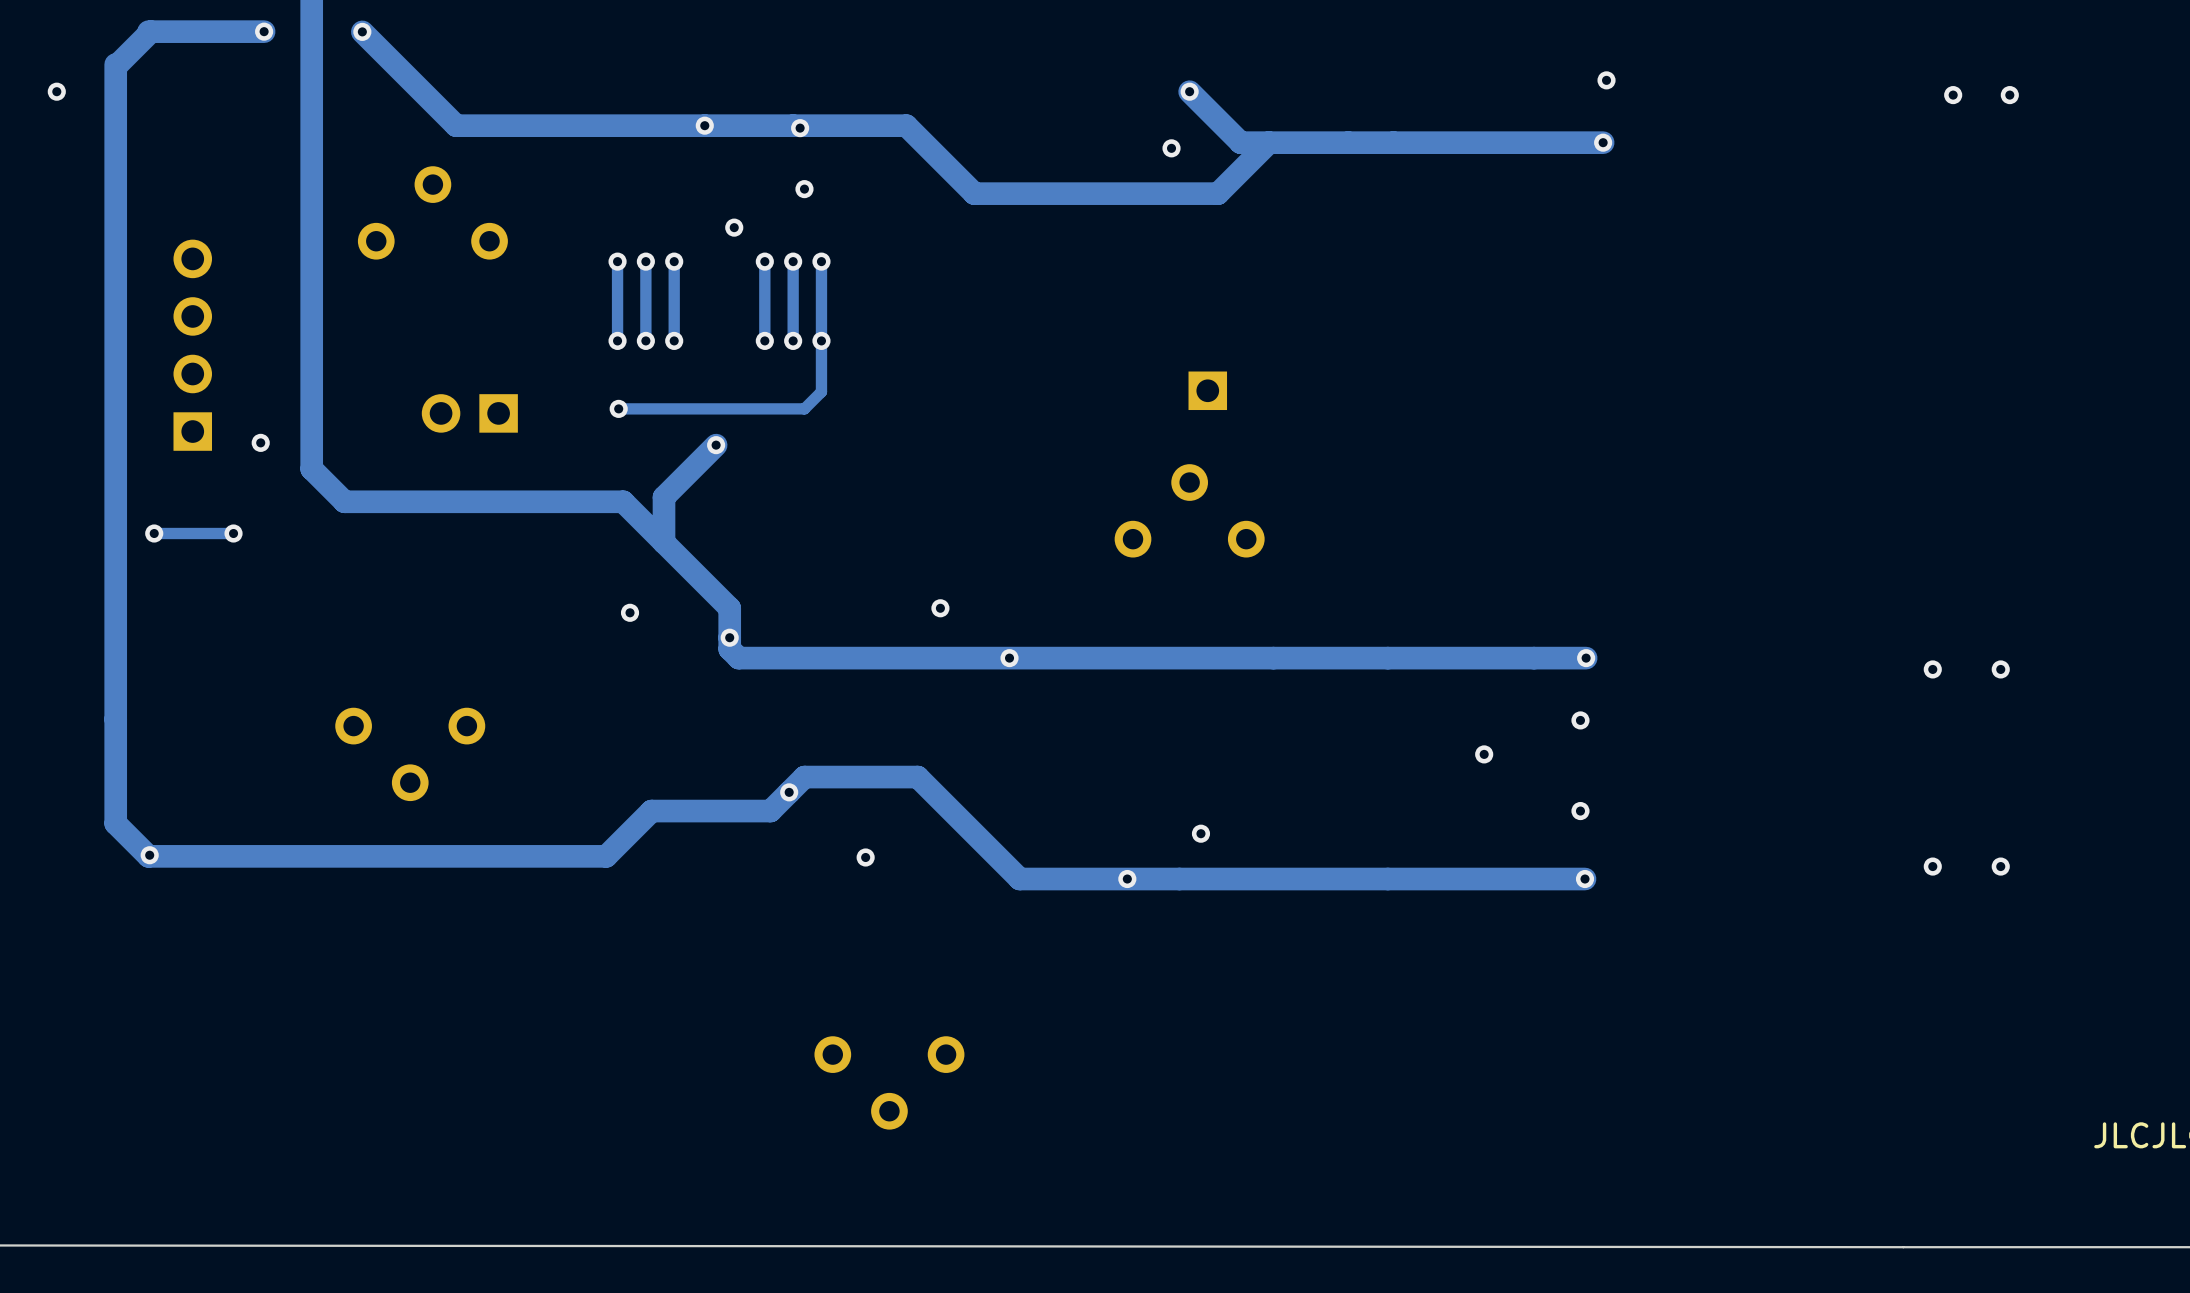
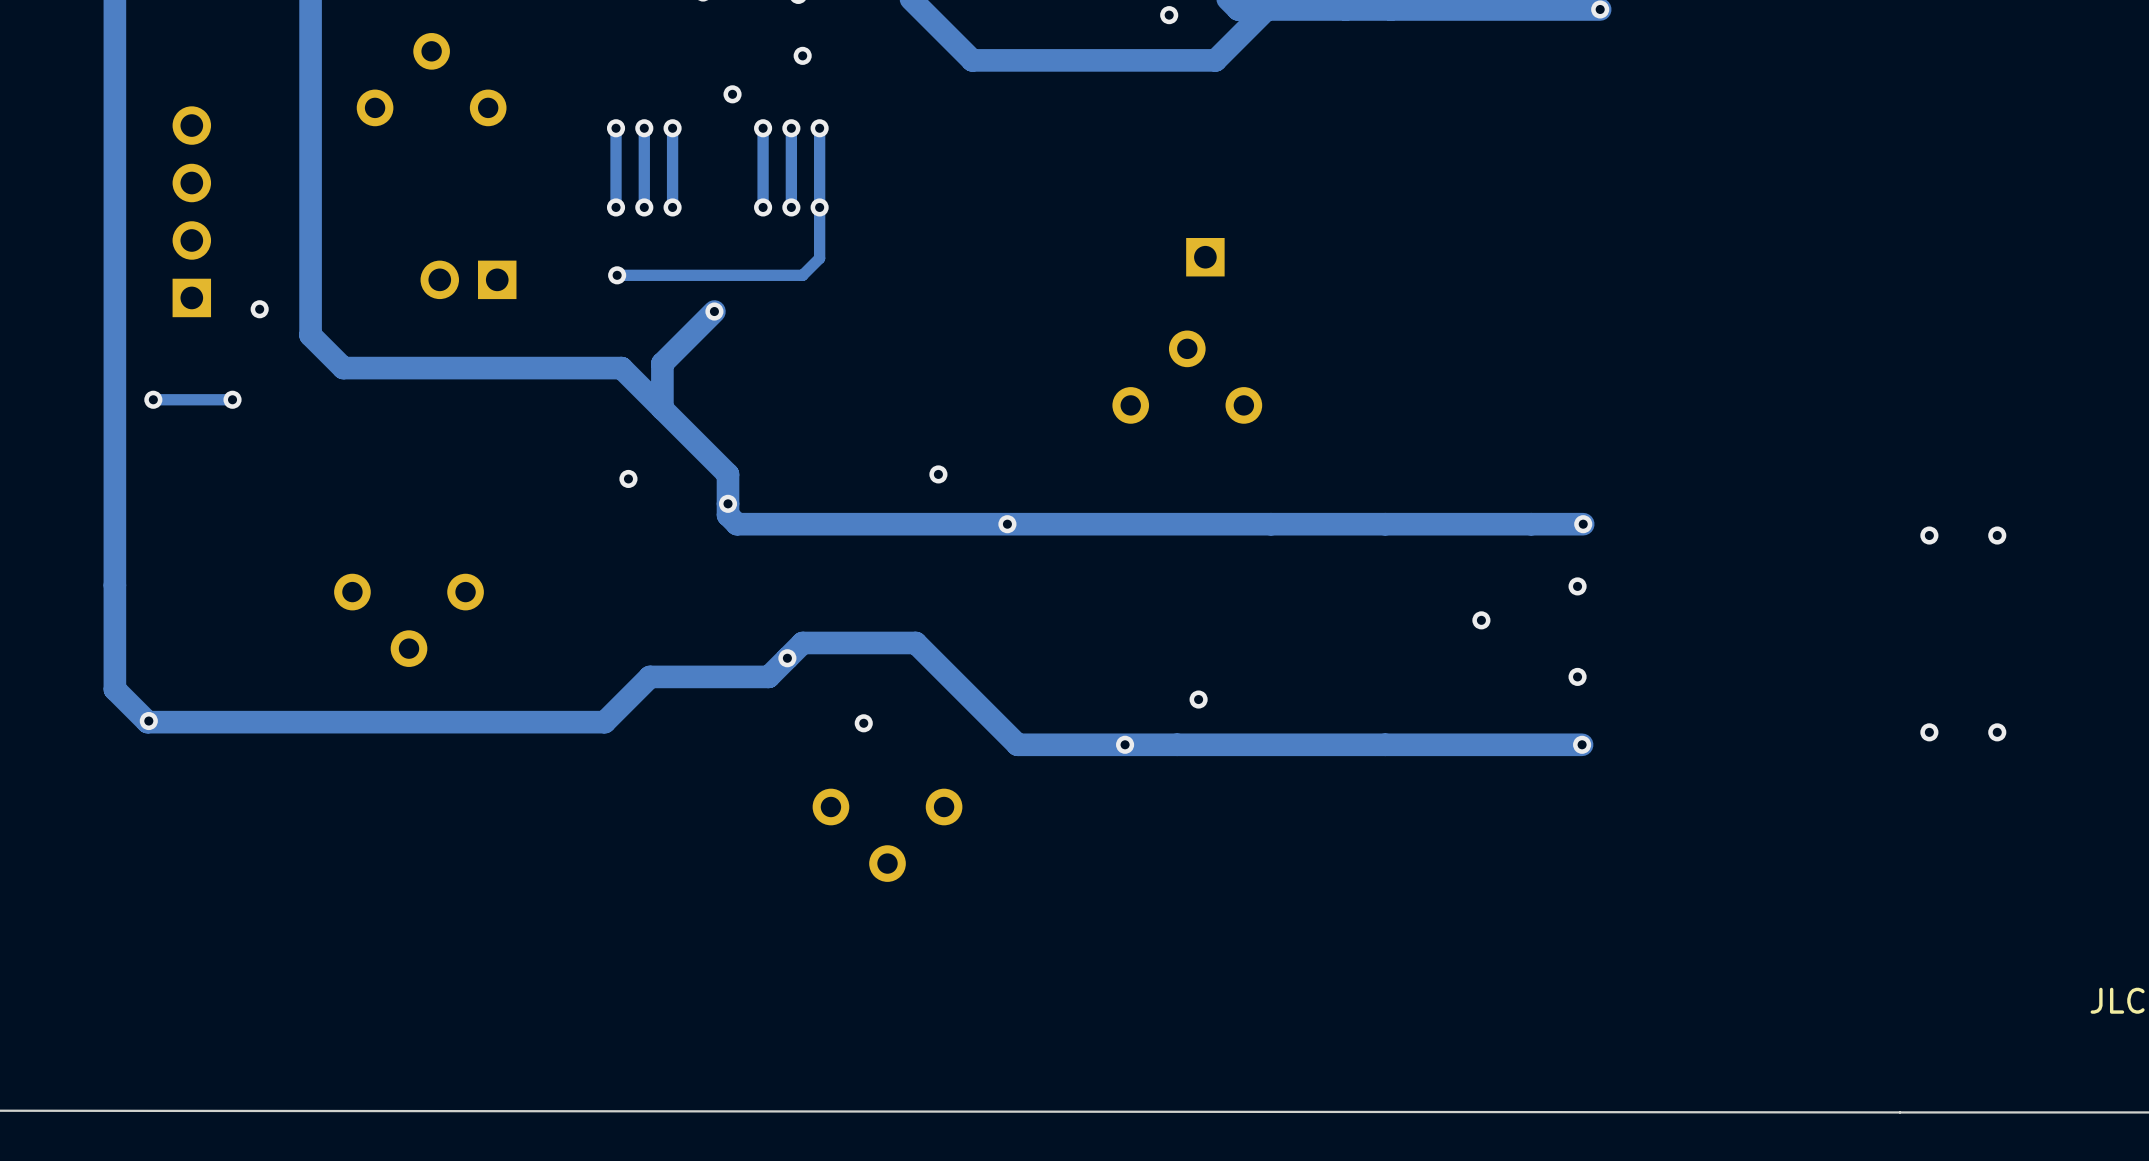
part position: (889, 1082) -> (887, 835)

